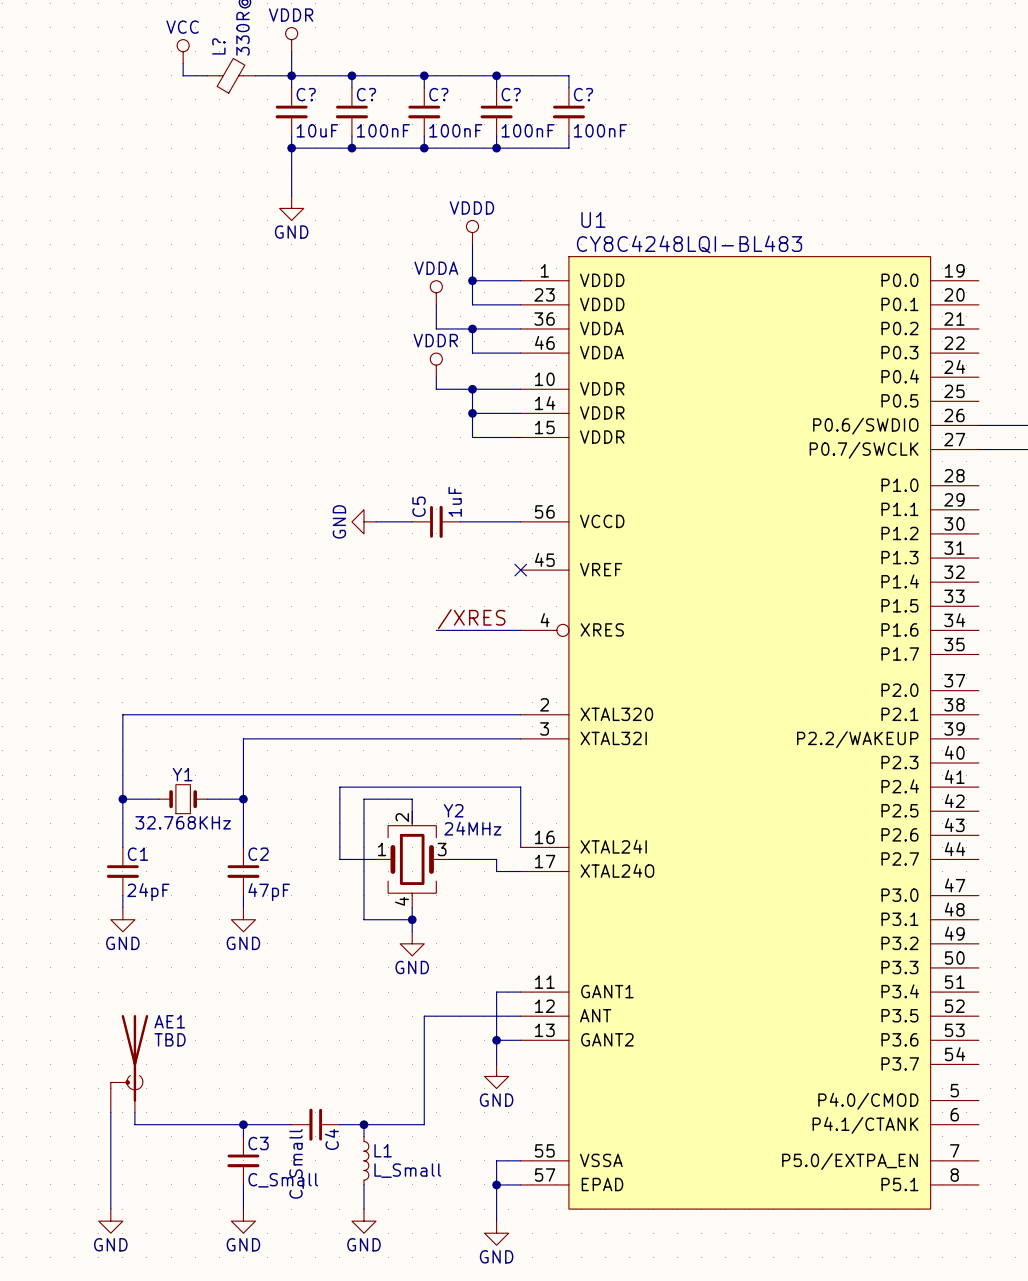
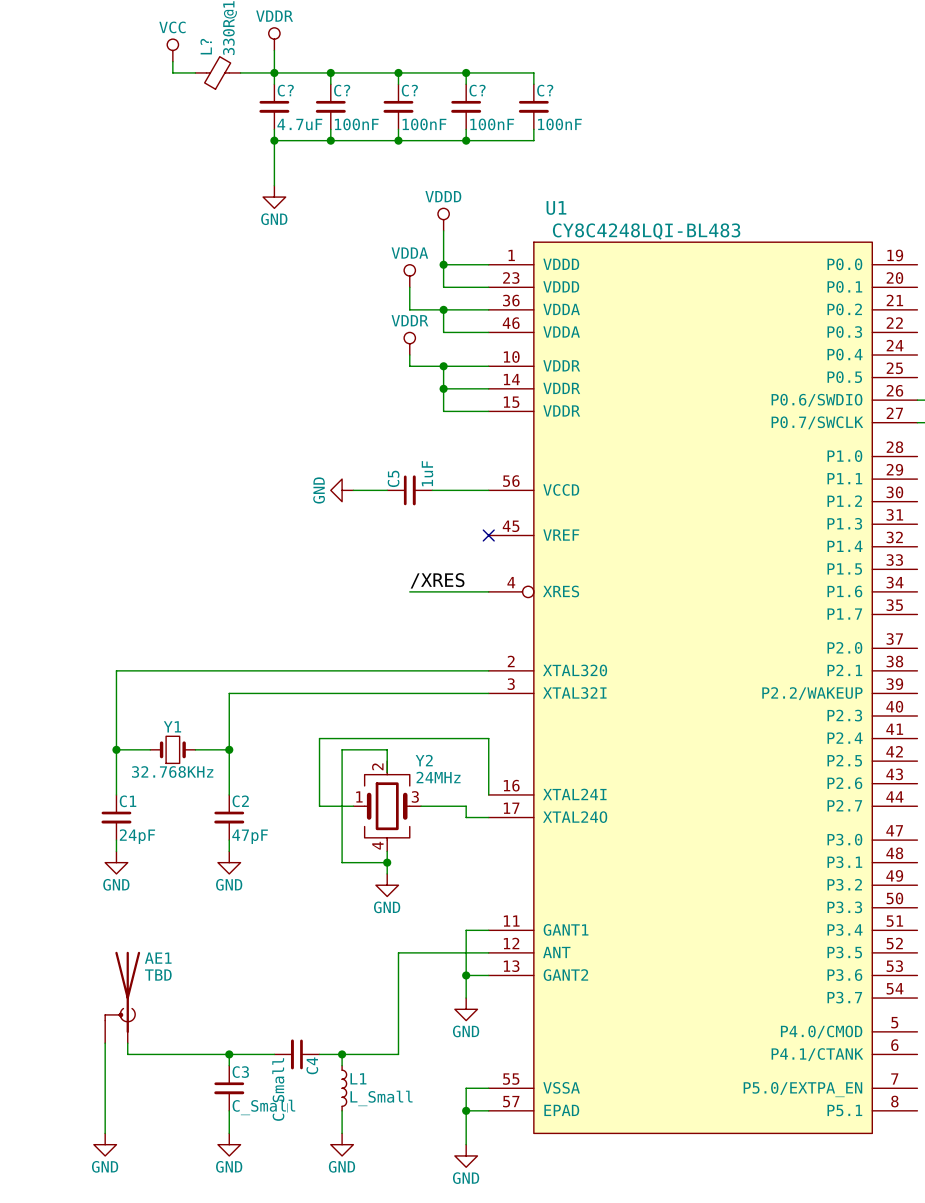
C? value: 10uF (317, 130) -> 4.7uF (299, 124)

